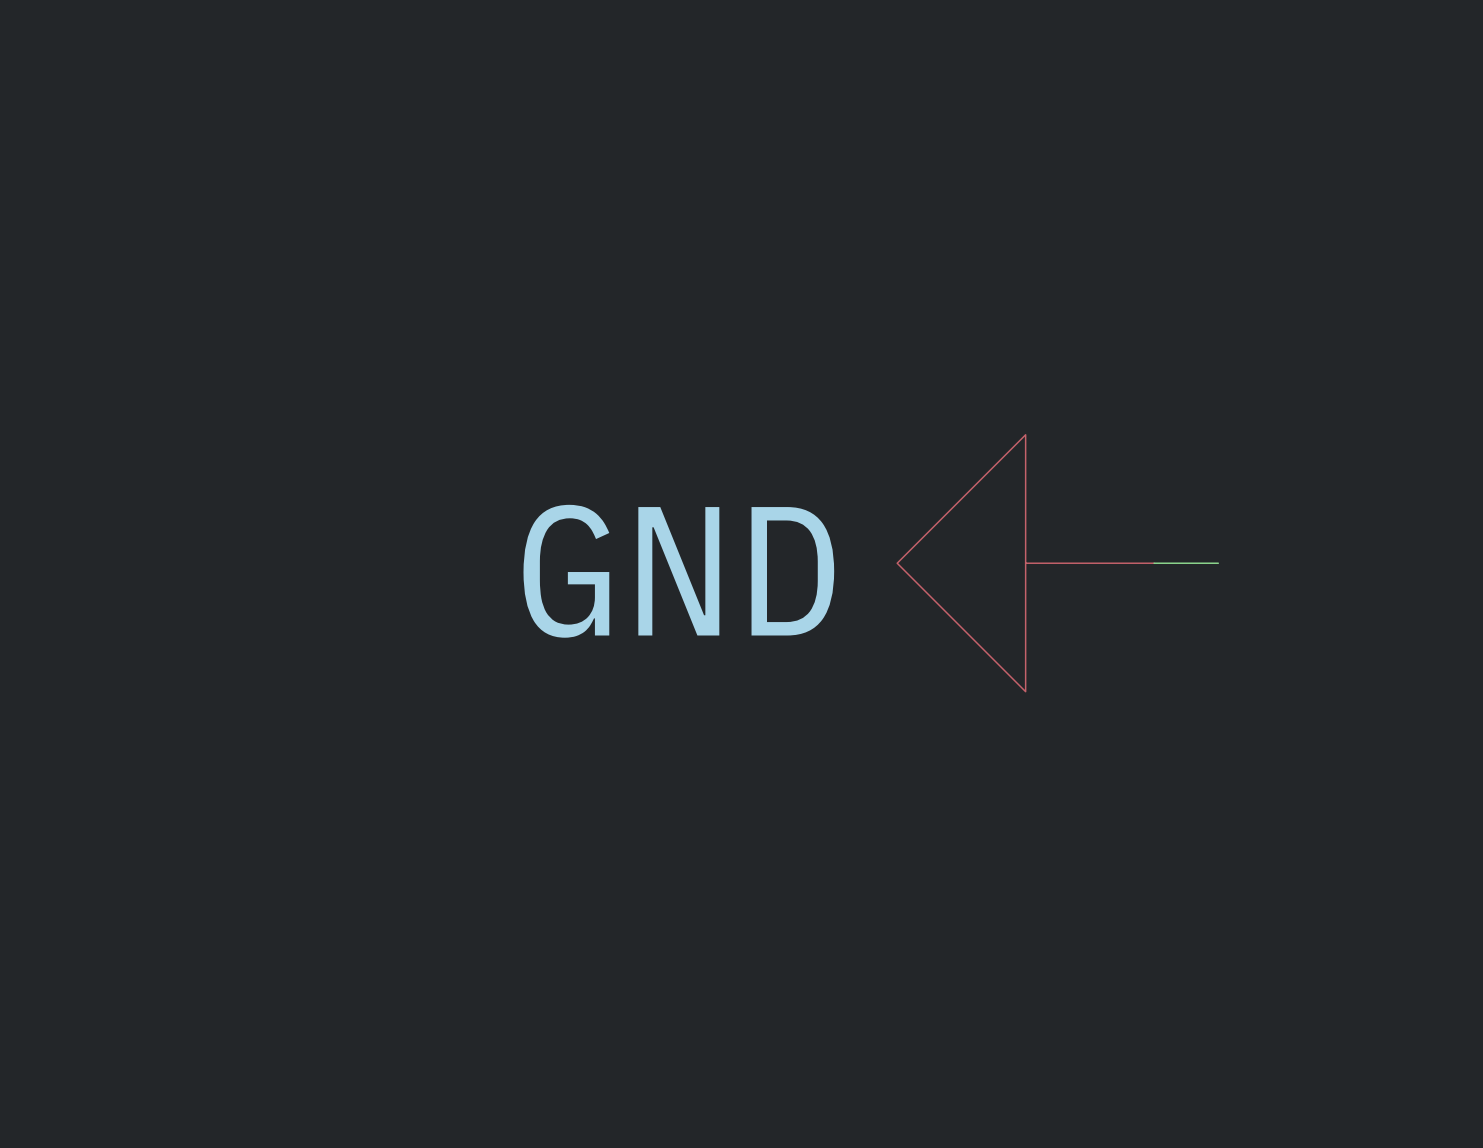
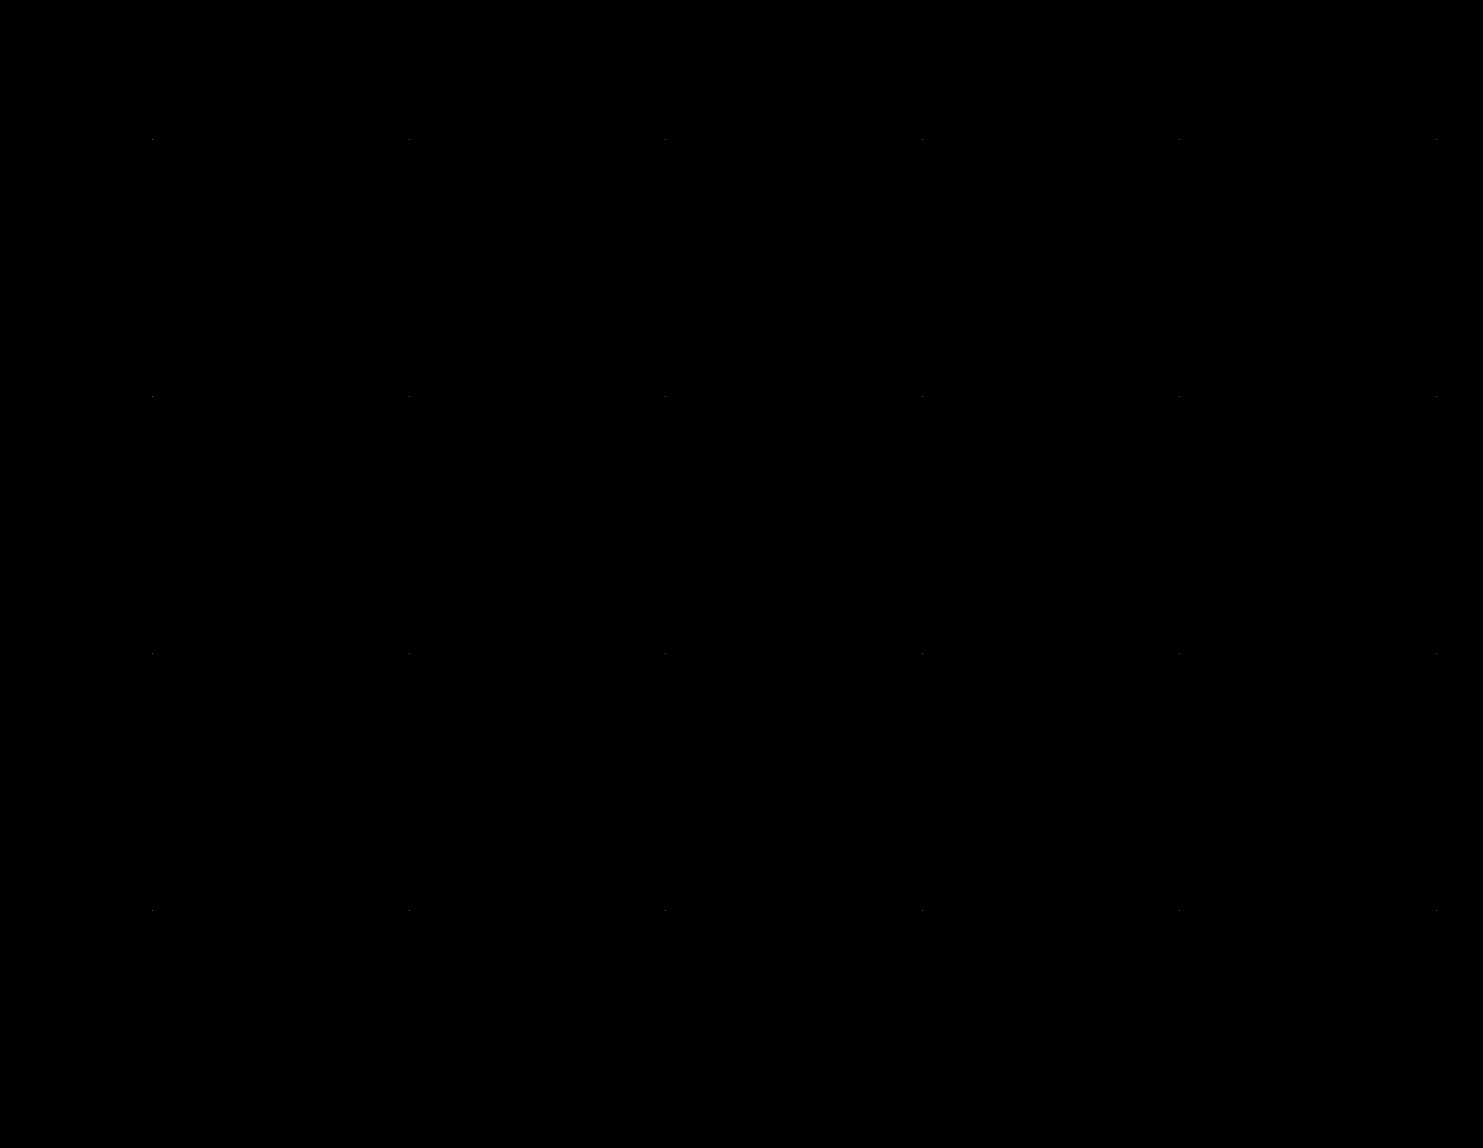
power symbol: GND (1025, 563) -> none
wire: (1154, 563) (1218, 563) -> none

